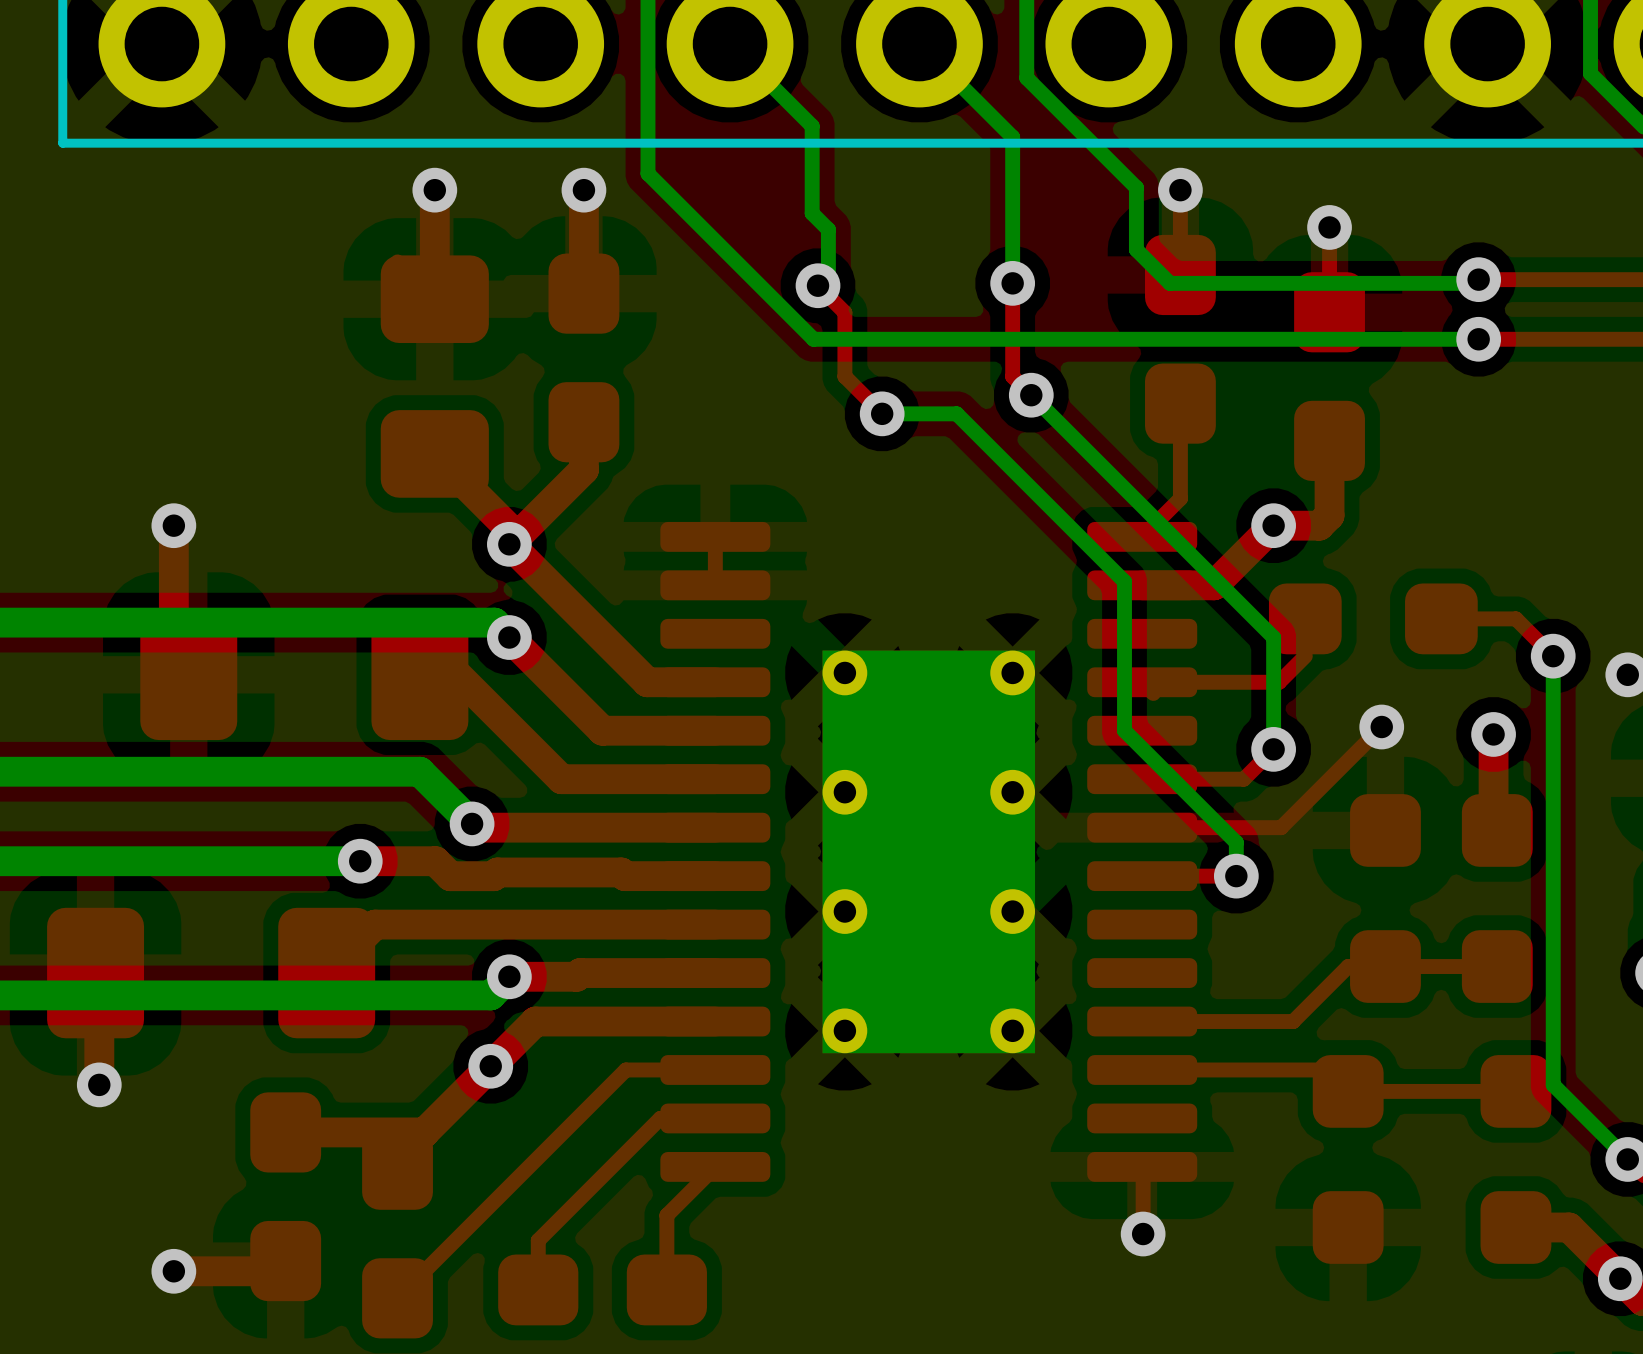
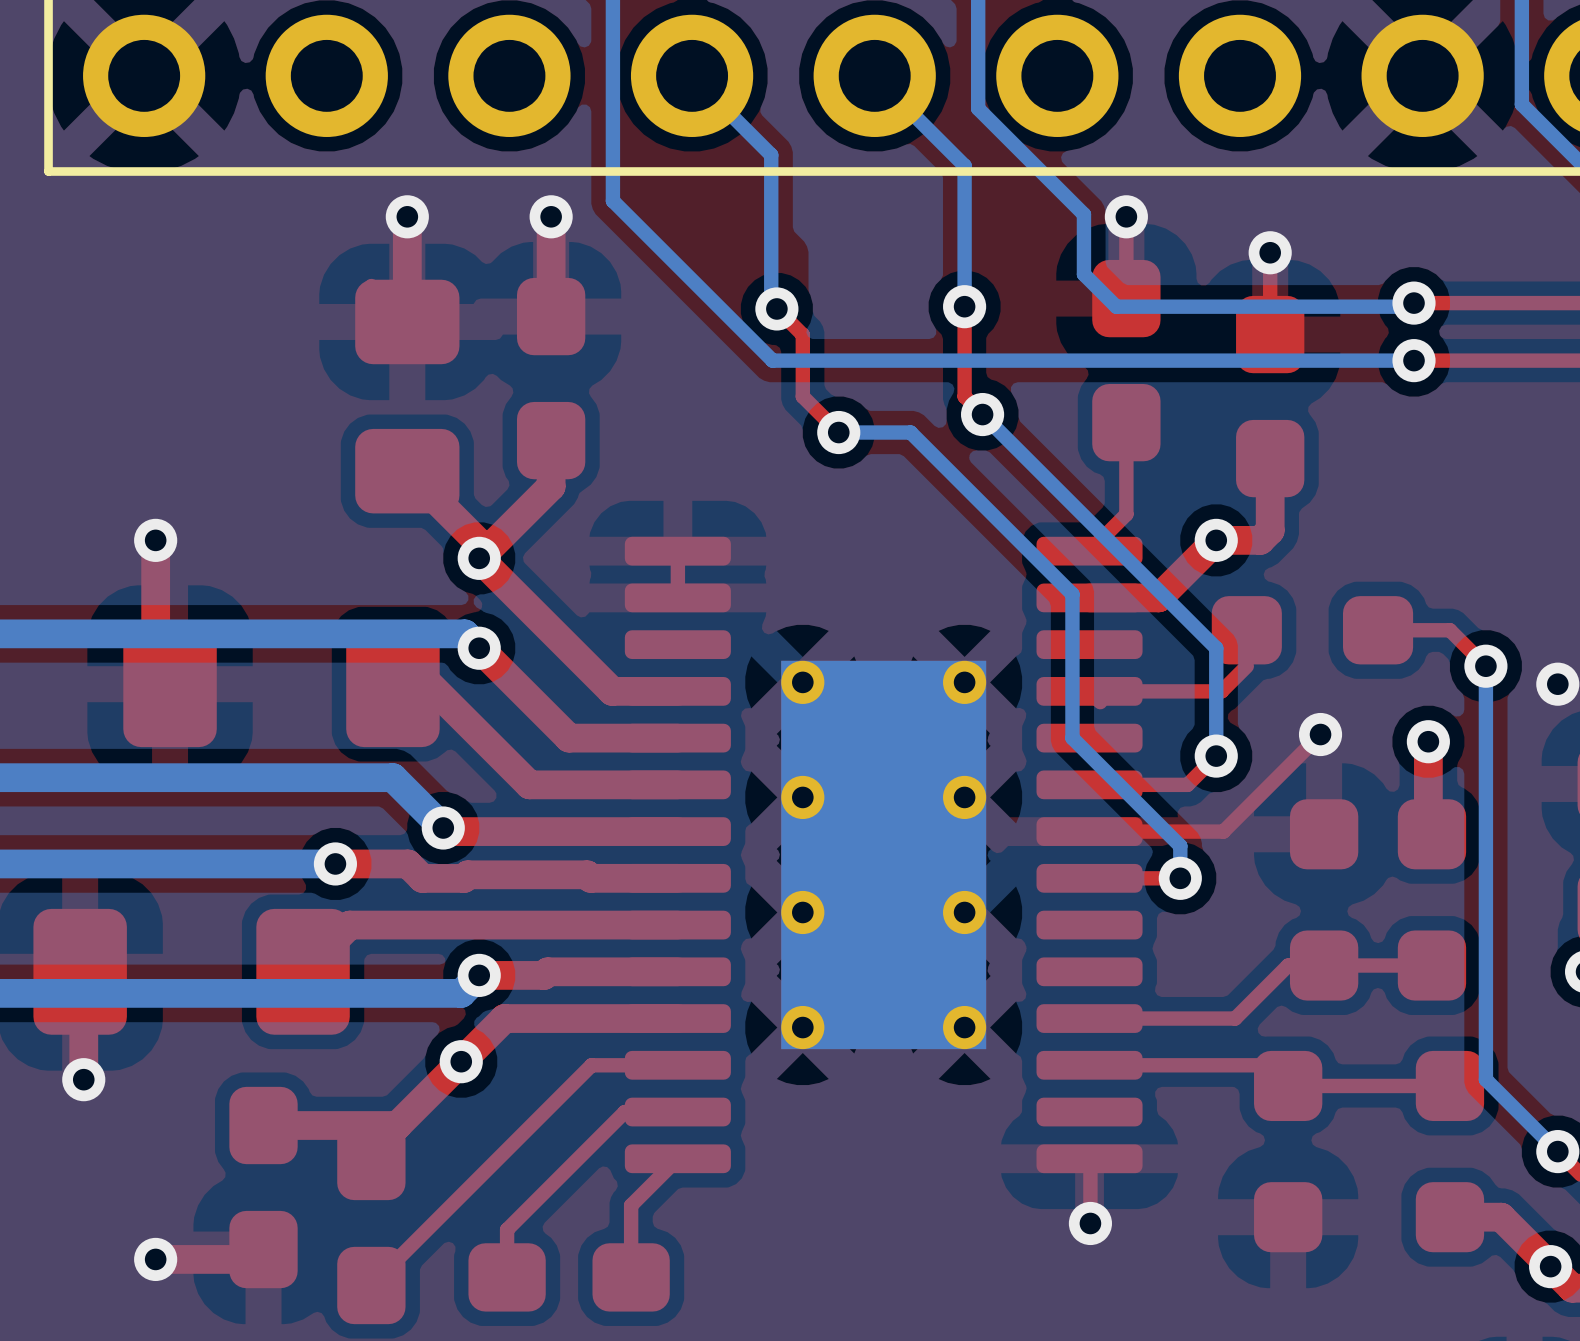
bottom track: (812, 213) (828, 229) (828, 275) -> (771, 239) (771, 303) (776, 308)

